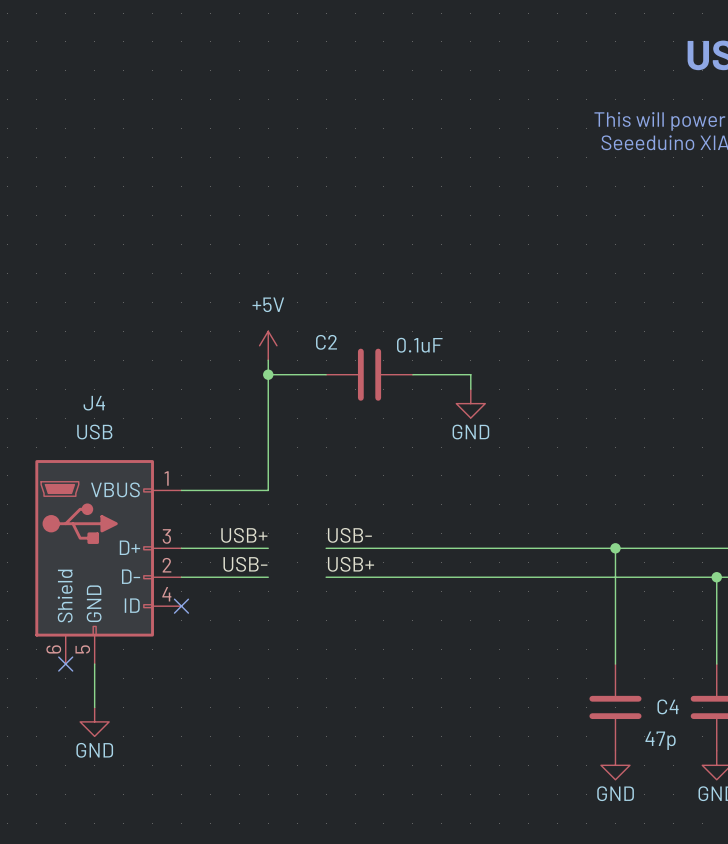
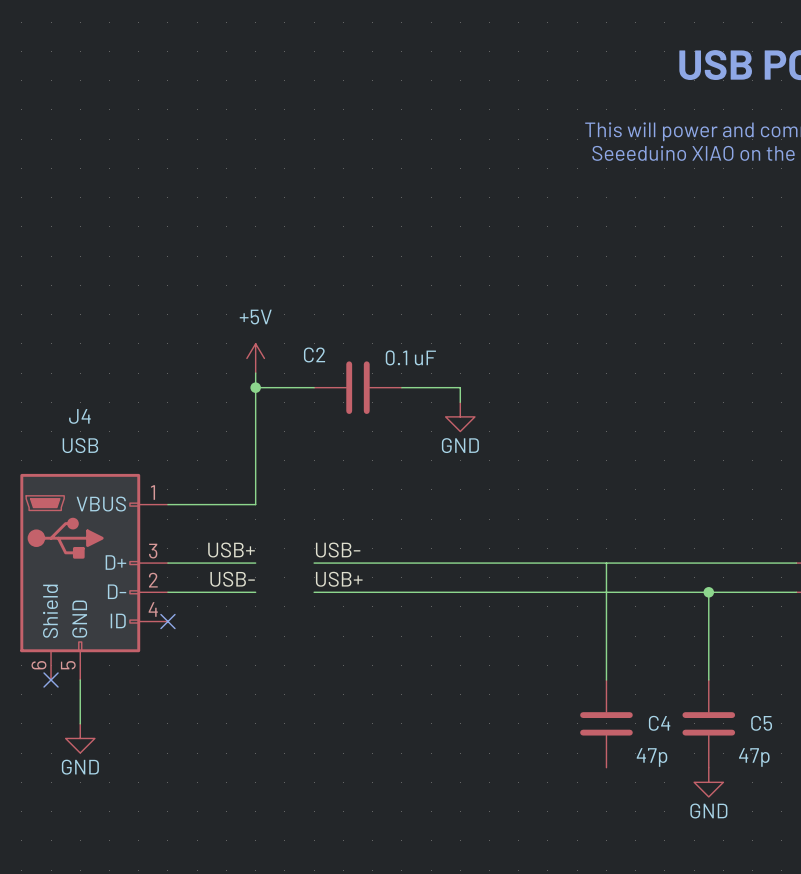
C2 value: 0.1uF (419, 345) -> 0.1 uF (410, 357)
junction: (615, 548) -> none
power symbol: GND (615, 765) -> none

